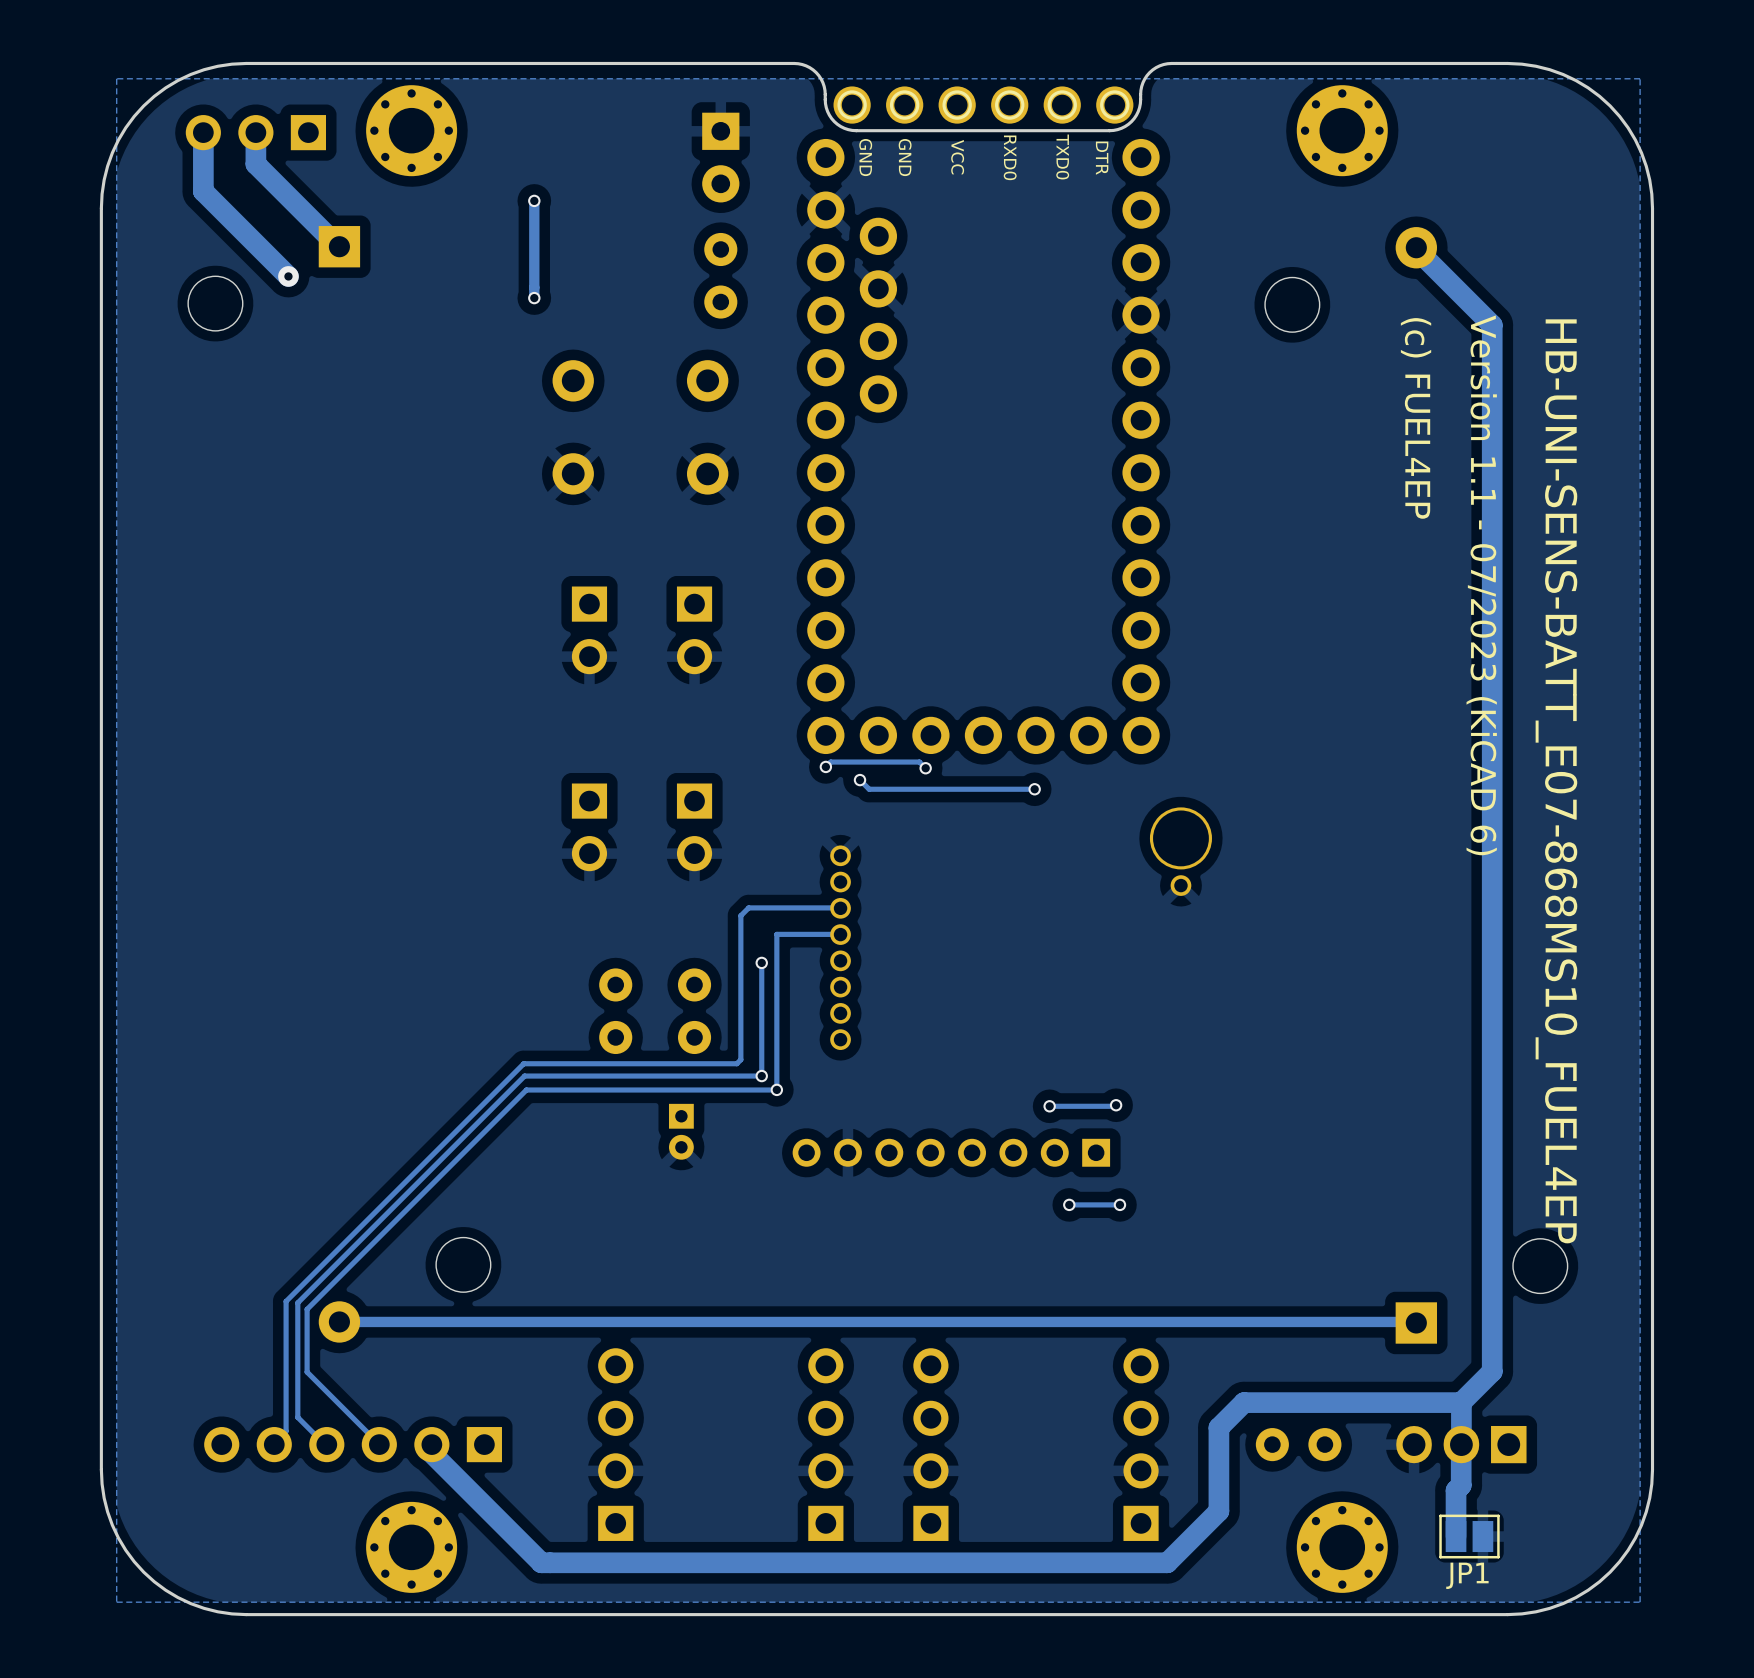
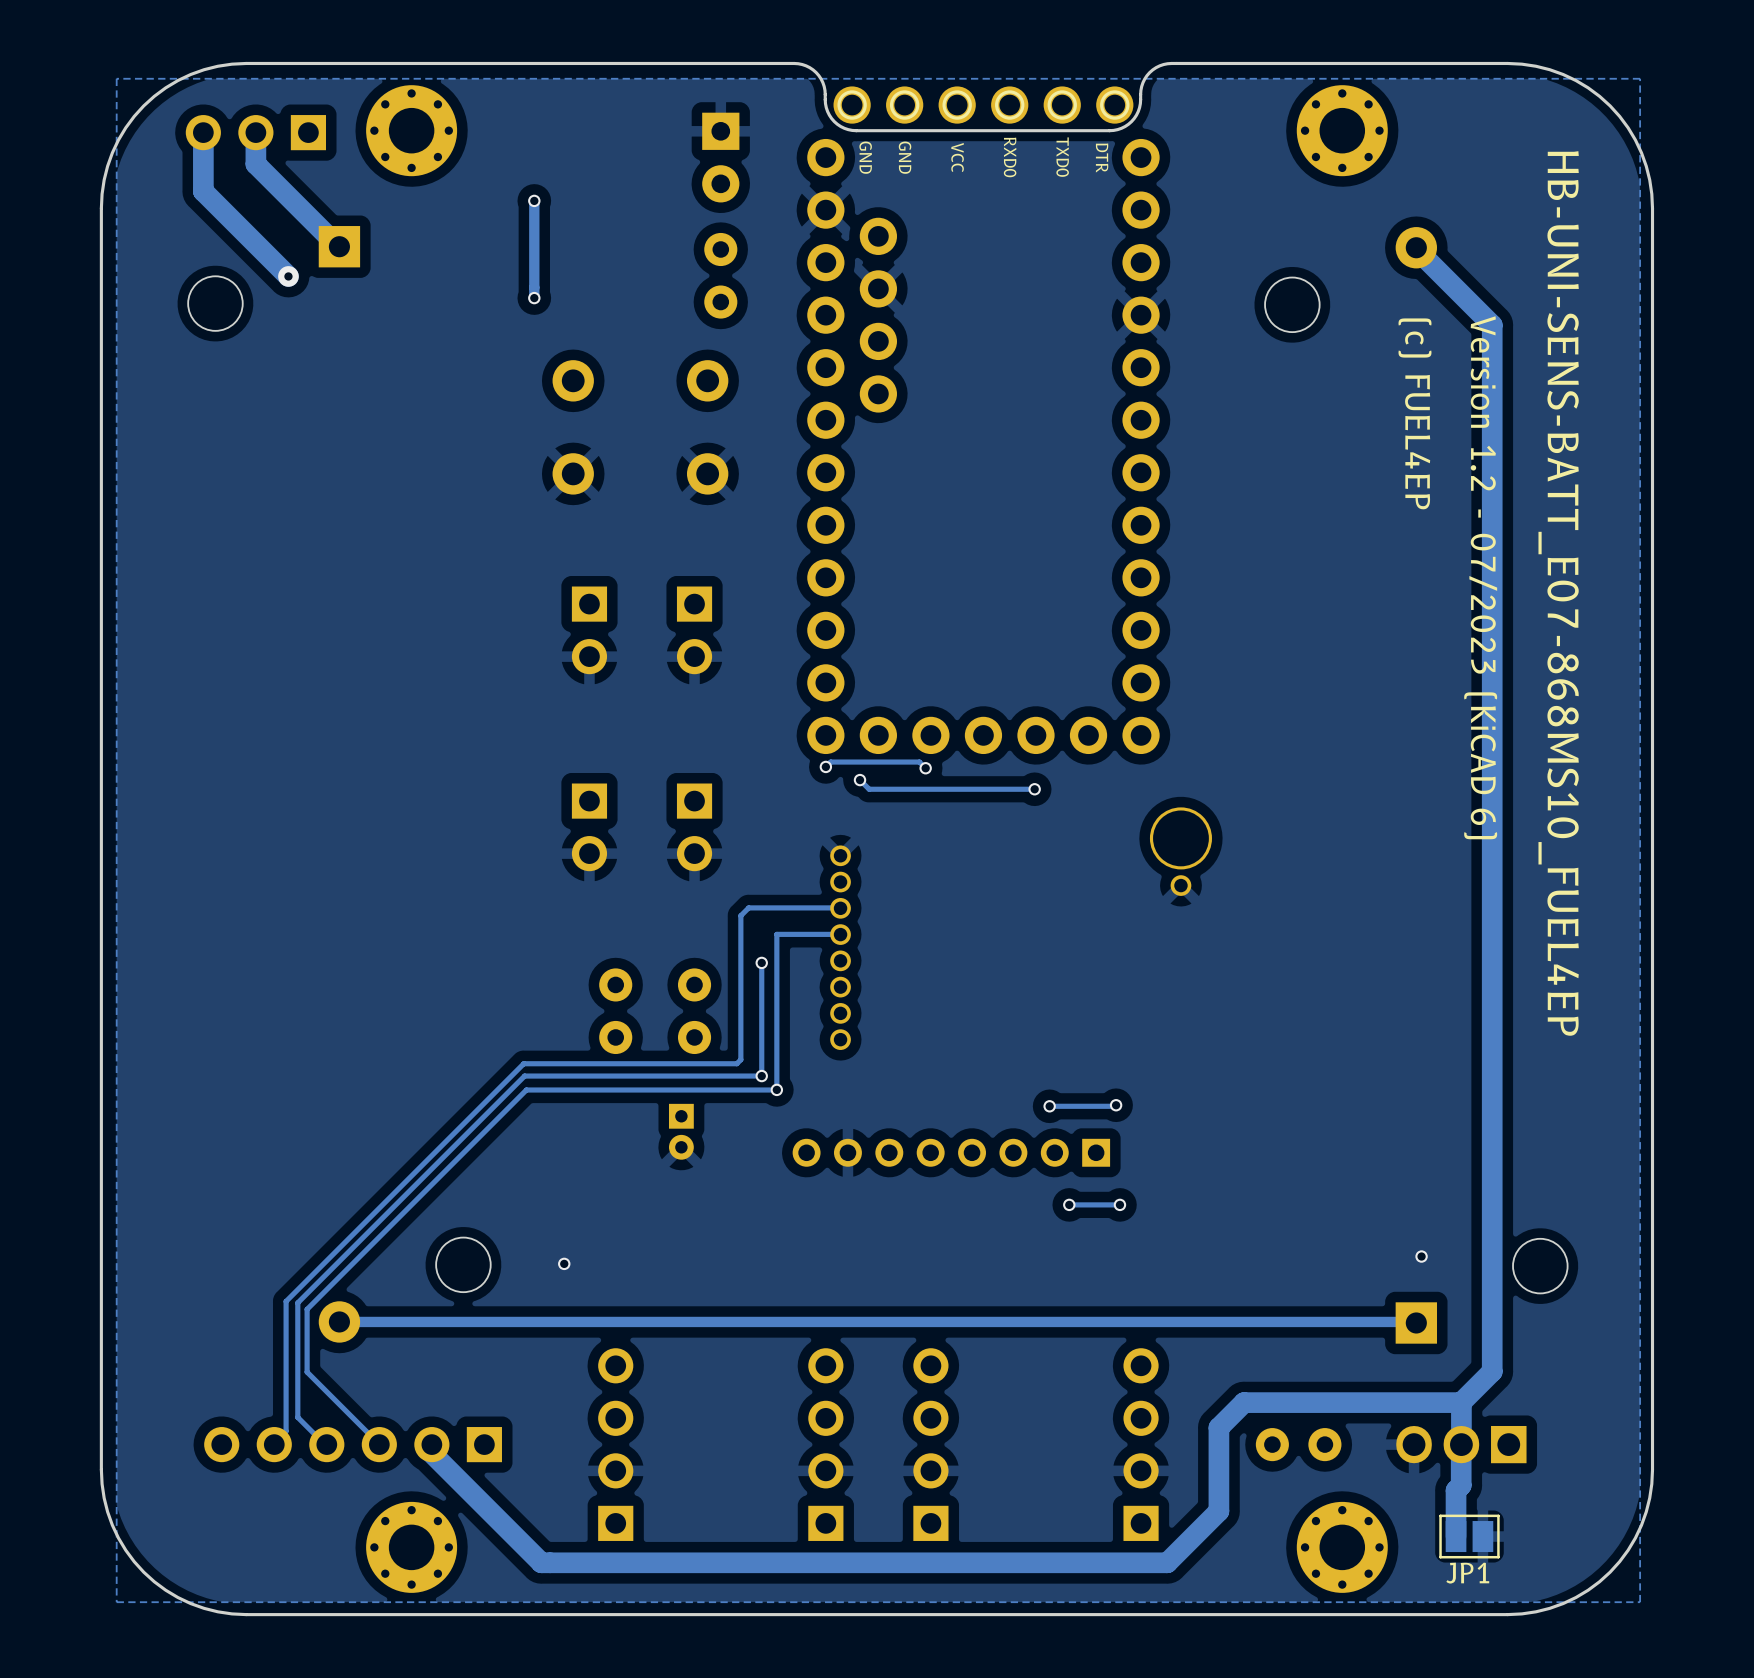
text: Version 1.1 - 07/2023 (KiCAD 6) (1481, 585) -> Version 1.2 - 07/2023 (KiCAD 6) (1480, 577)
text position: HB-UNI-SENS-BATT_E07-868MS10_FUEL4EP (1556, 781) -> HB-UNI-SENS-BATT_E07-868MS10_FUEL4EP (1558, 593)
via: none -> (1421, 1256)
via: none -> (564, 1263)

